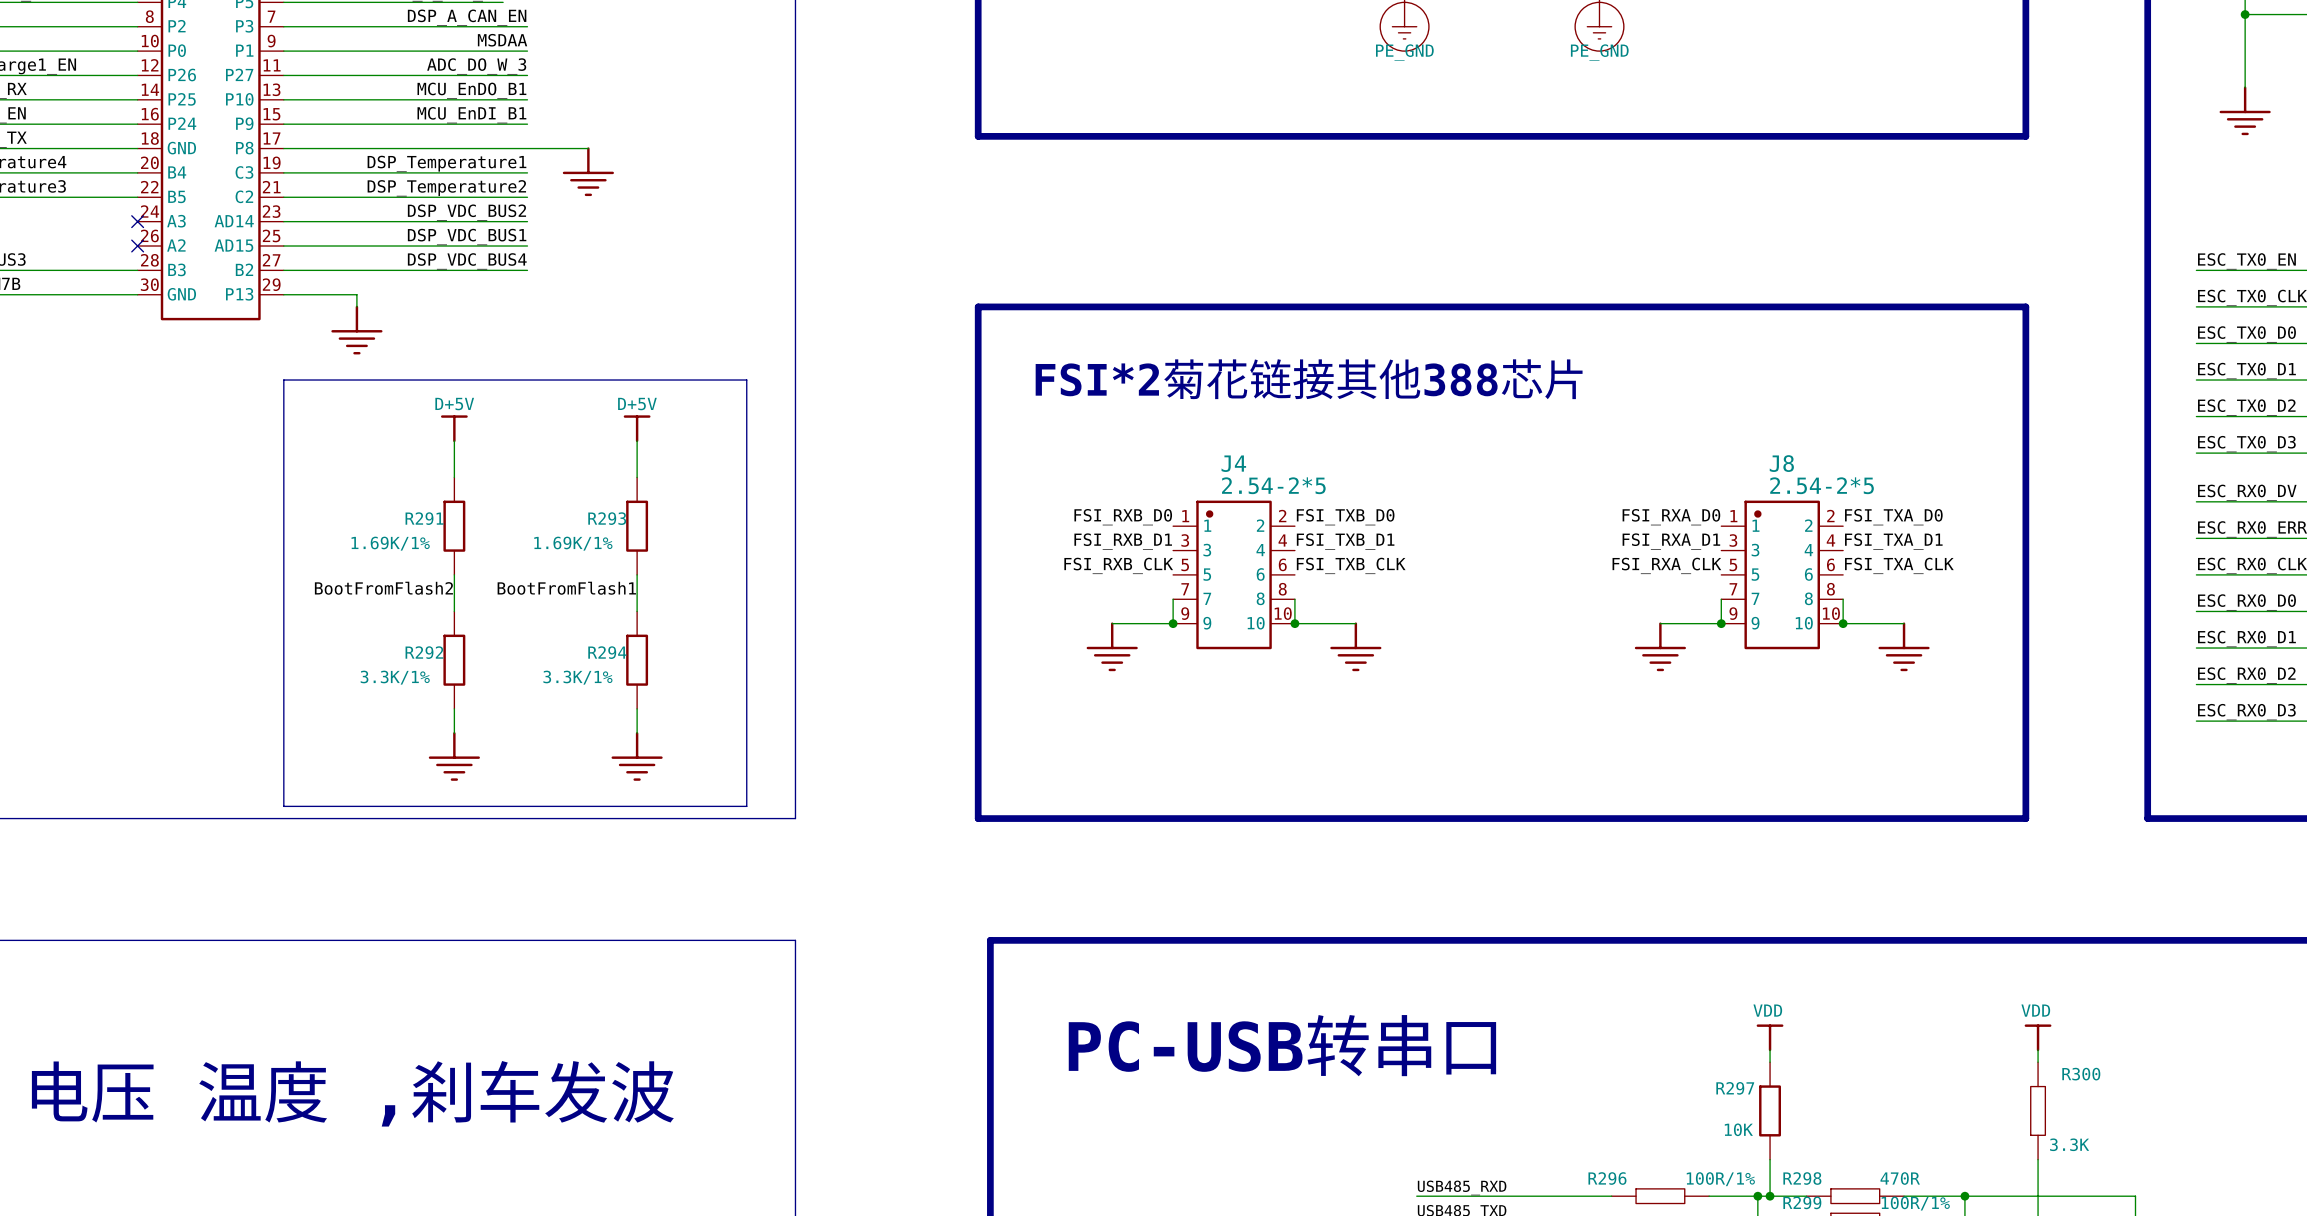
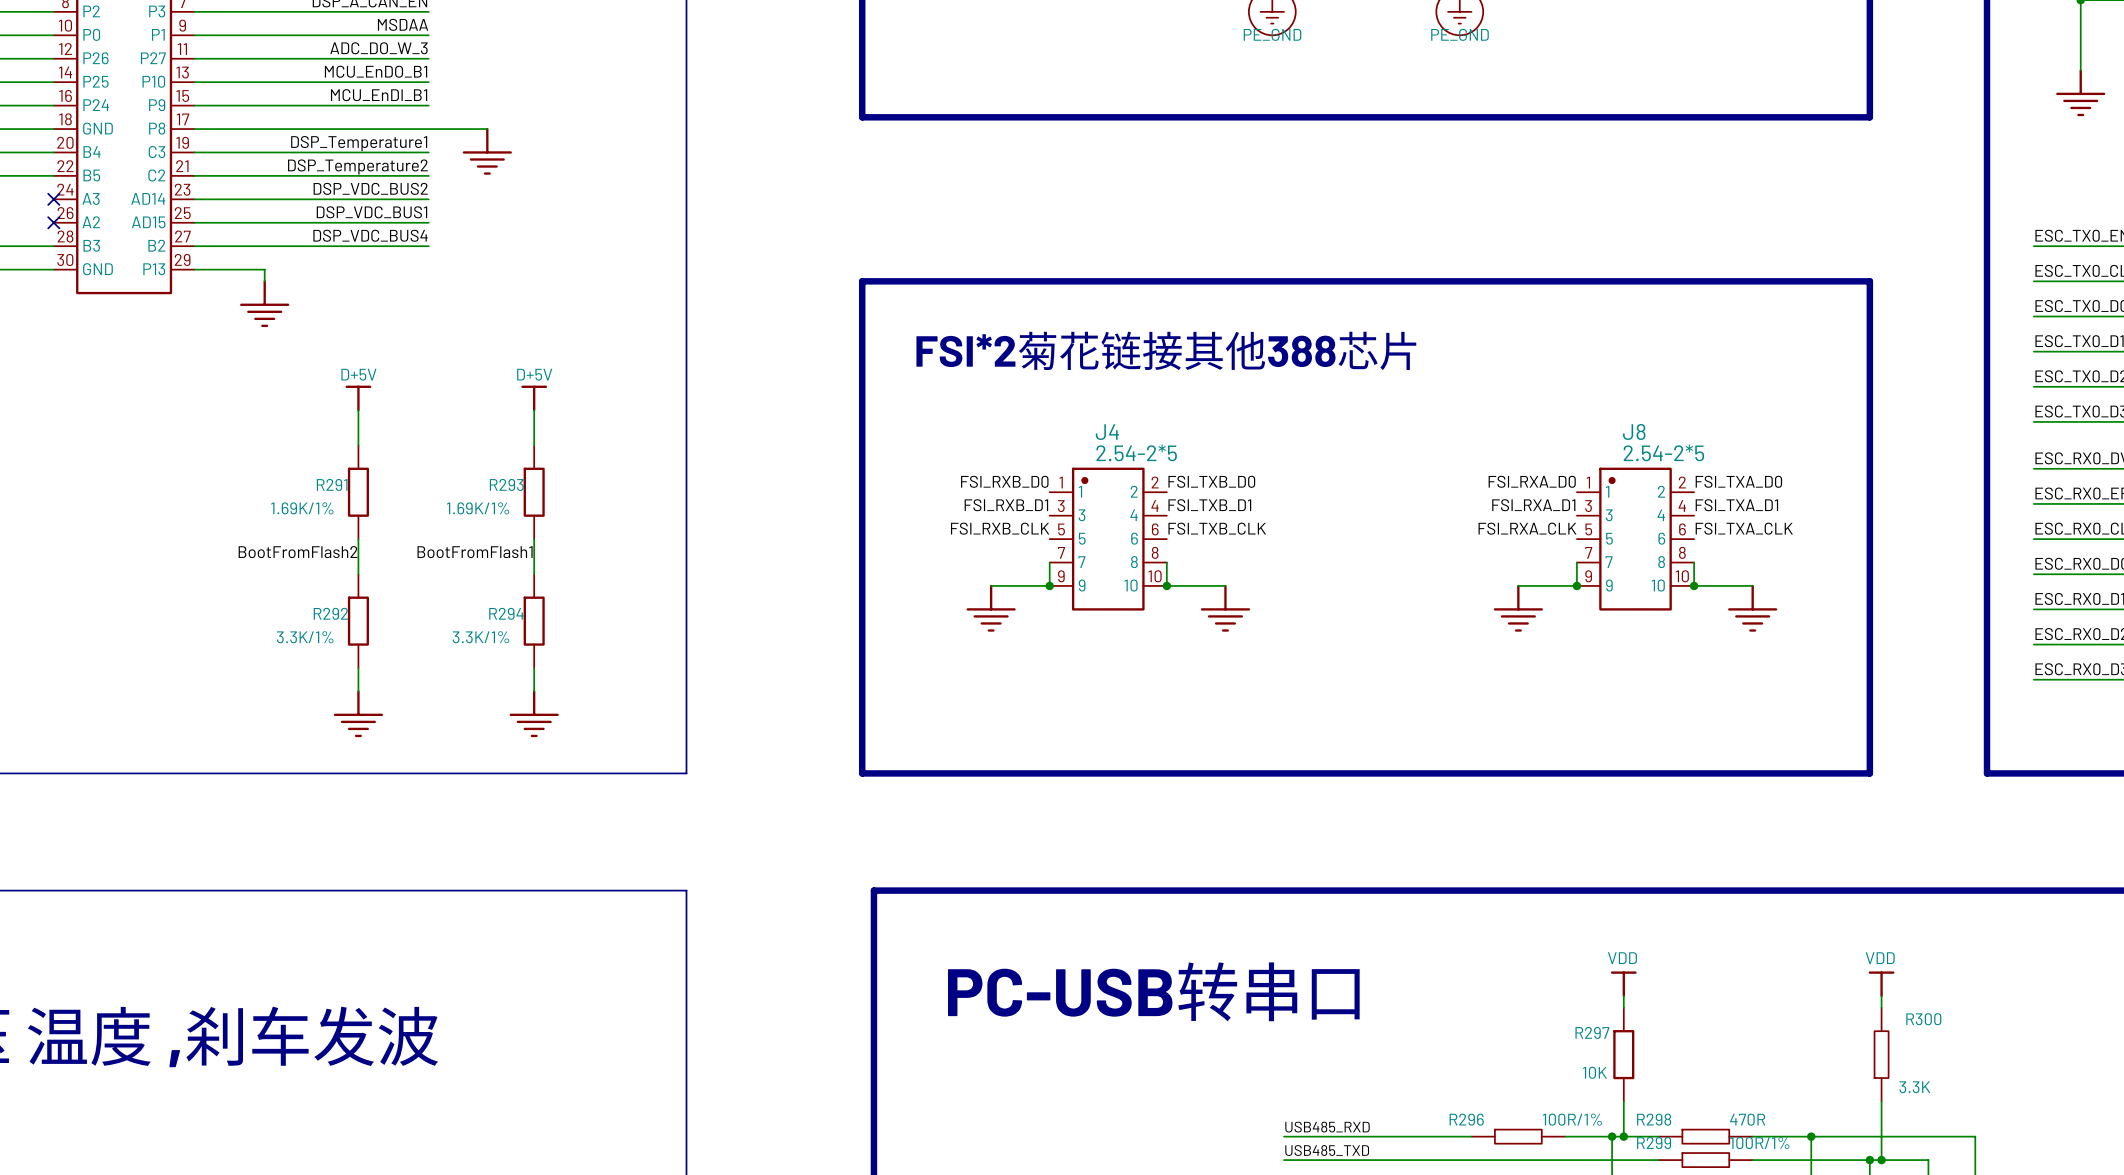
line: (283, 380) (746, 380) (746, 806) (283, 806) (283, 380) -> none

